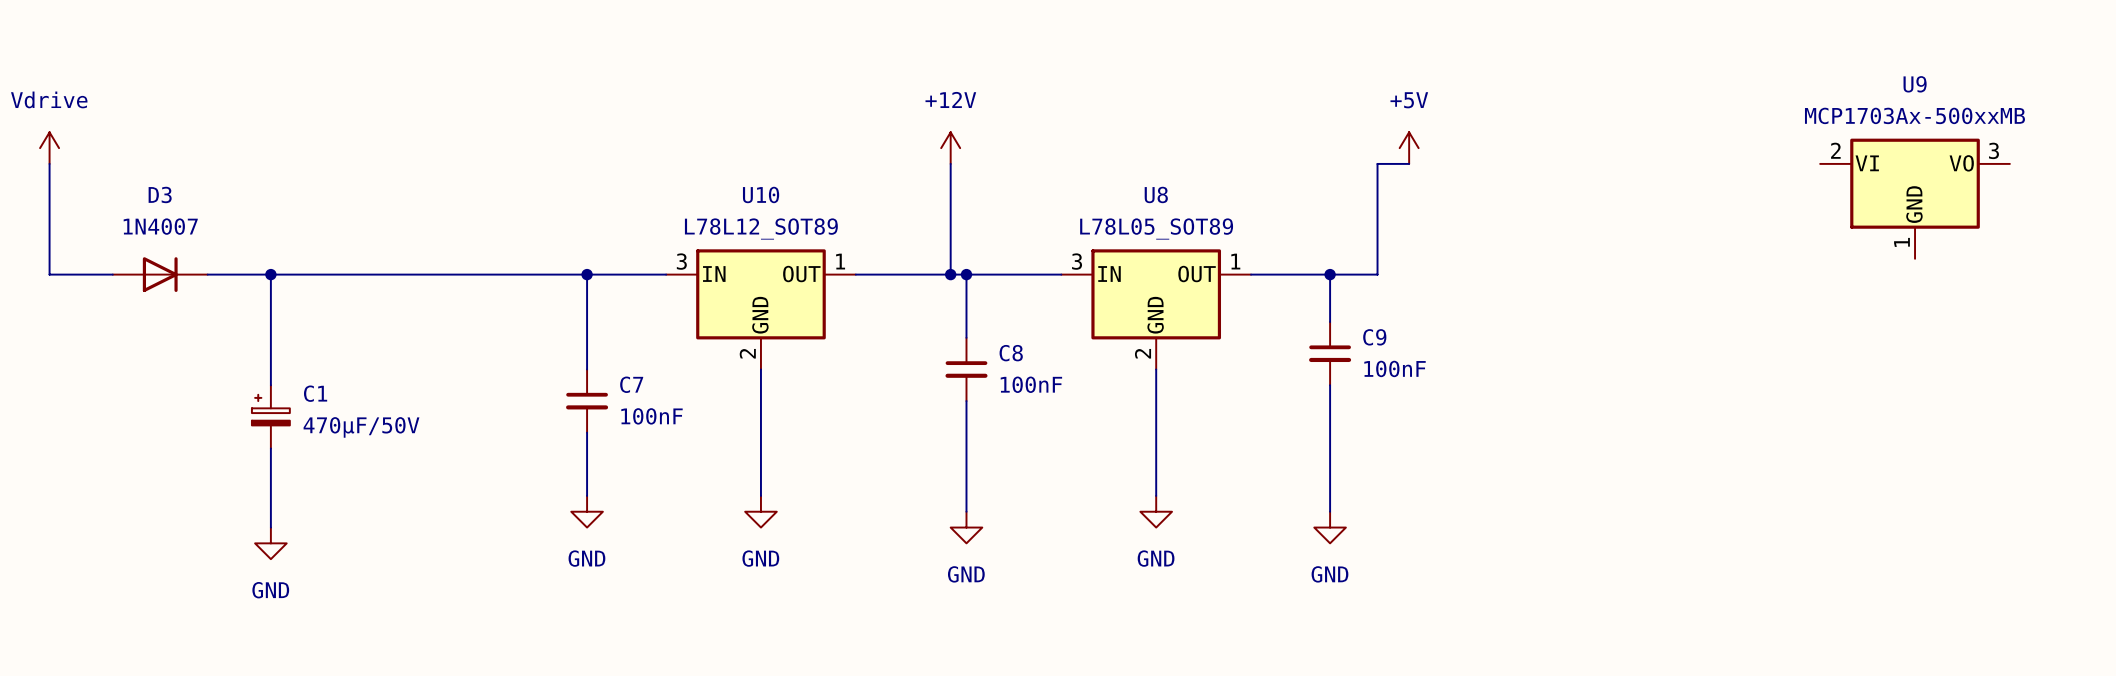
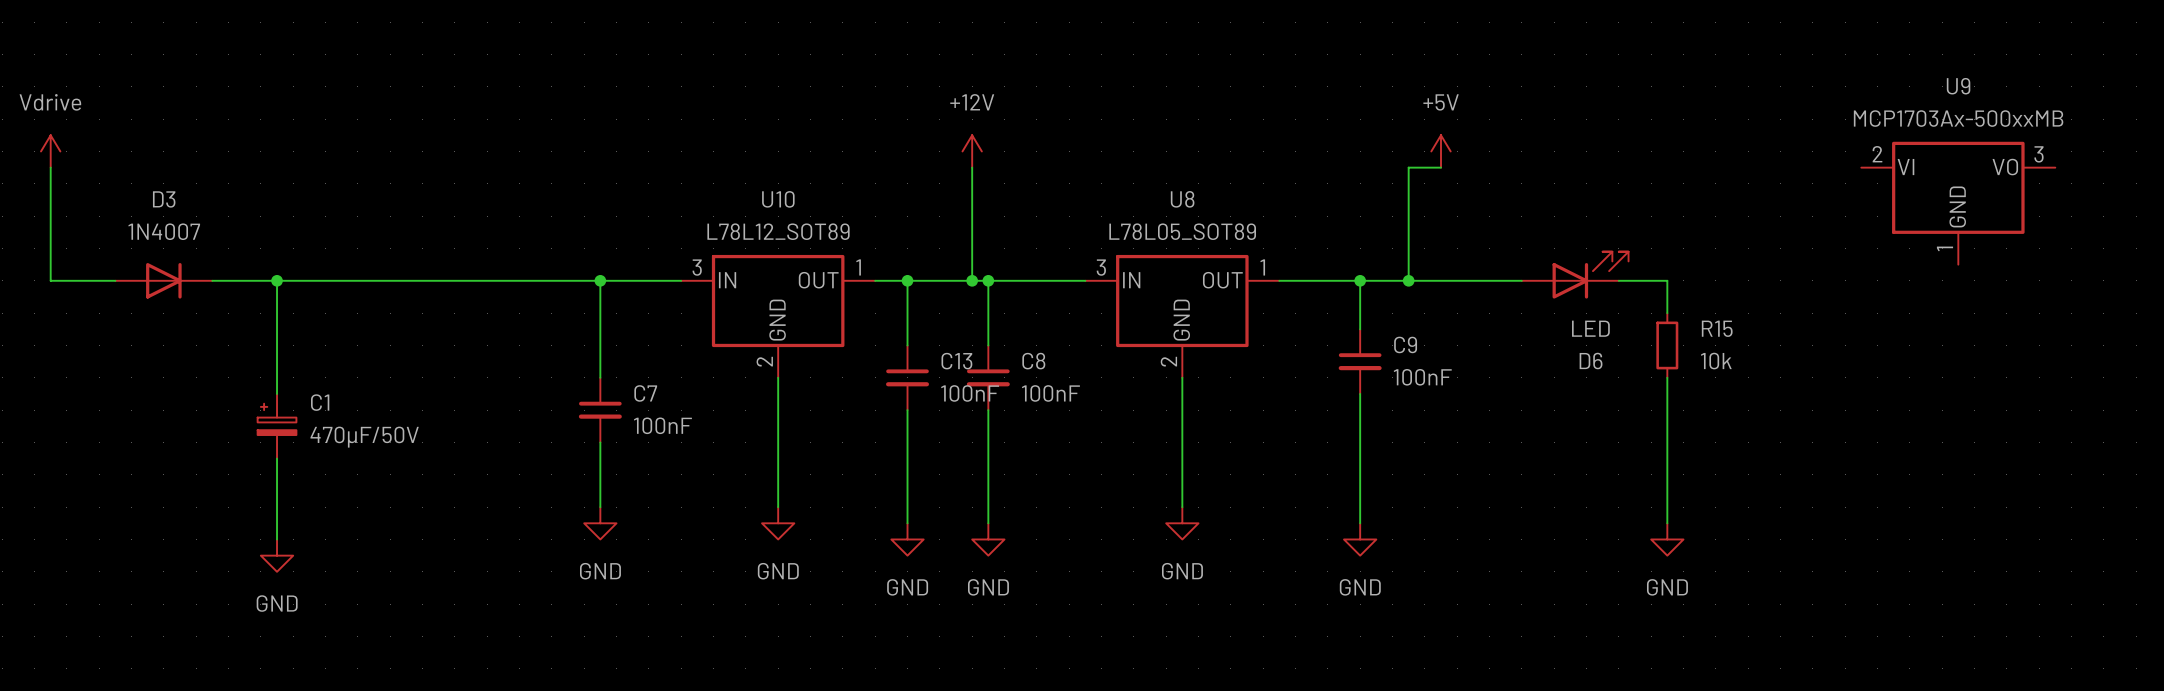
D6: none -> LED (1575, 275)
wire: none -> (907, 280) (907, 345)
junction: none -> (907, 280)
wire: none -> (1408, 280) (1521, 280)
junction: none -> (1408, 280)
wire: none -> (1618, 280) (1667, 280) (1667, 313)
R15: none -> 10k (1667, 345)
C13: none -> 100nF (907, 377)
wire: none -> (1667, 377) (1667, 523)
wire: none -> (907, 410) (907, 523)
power symbol: none -> GND (907, 539)
power symbol: none -> GND (1667, 539)

